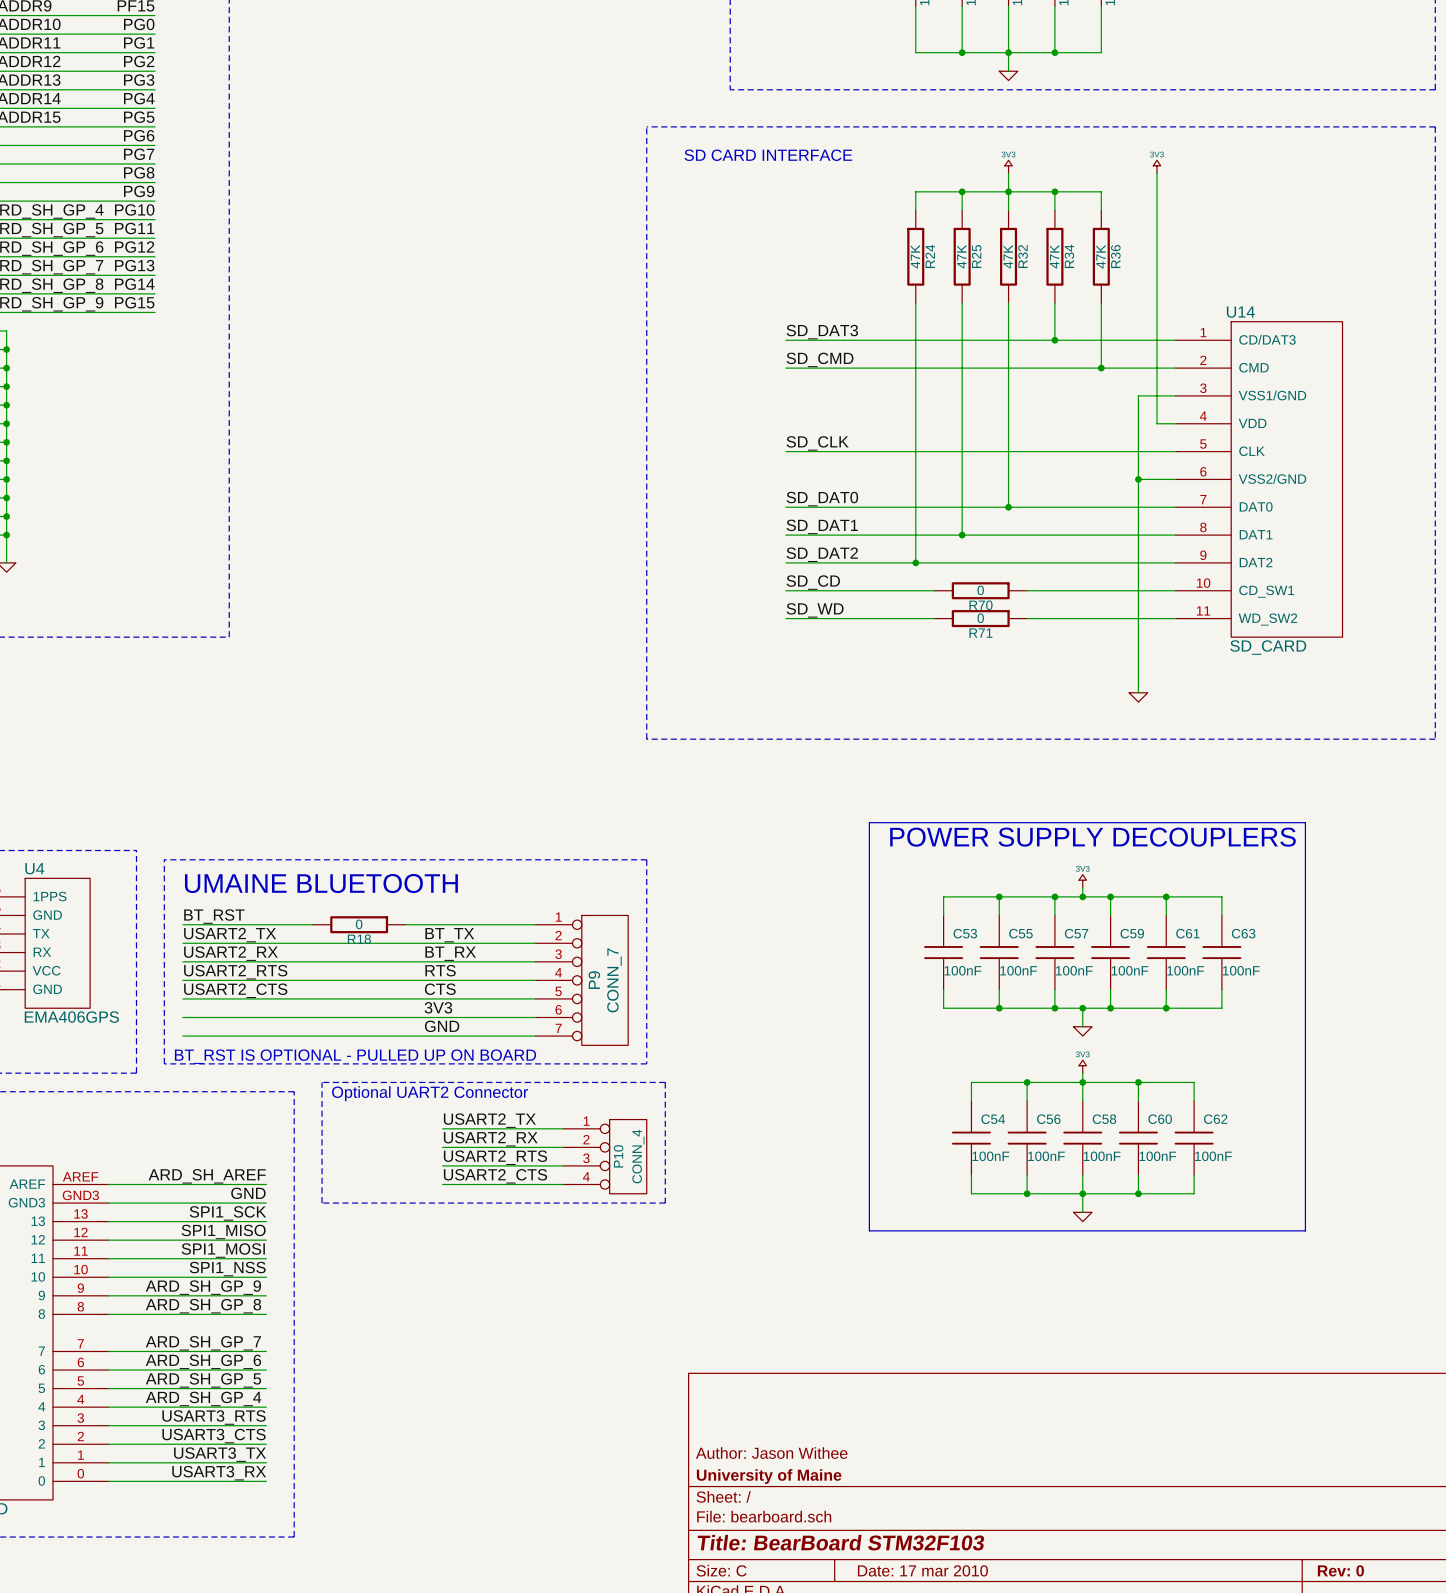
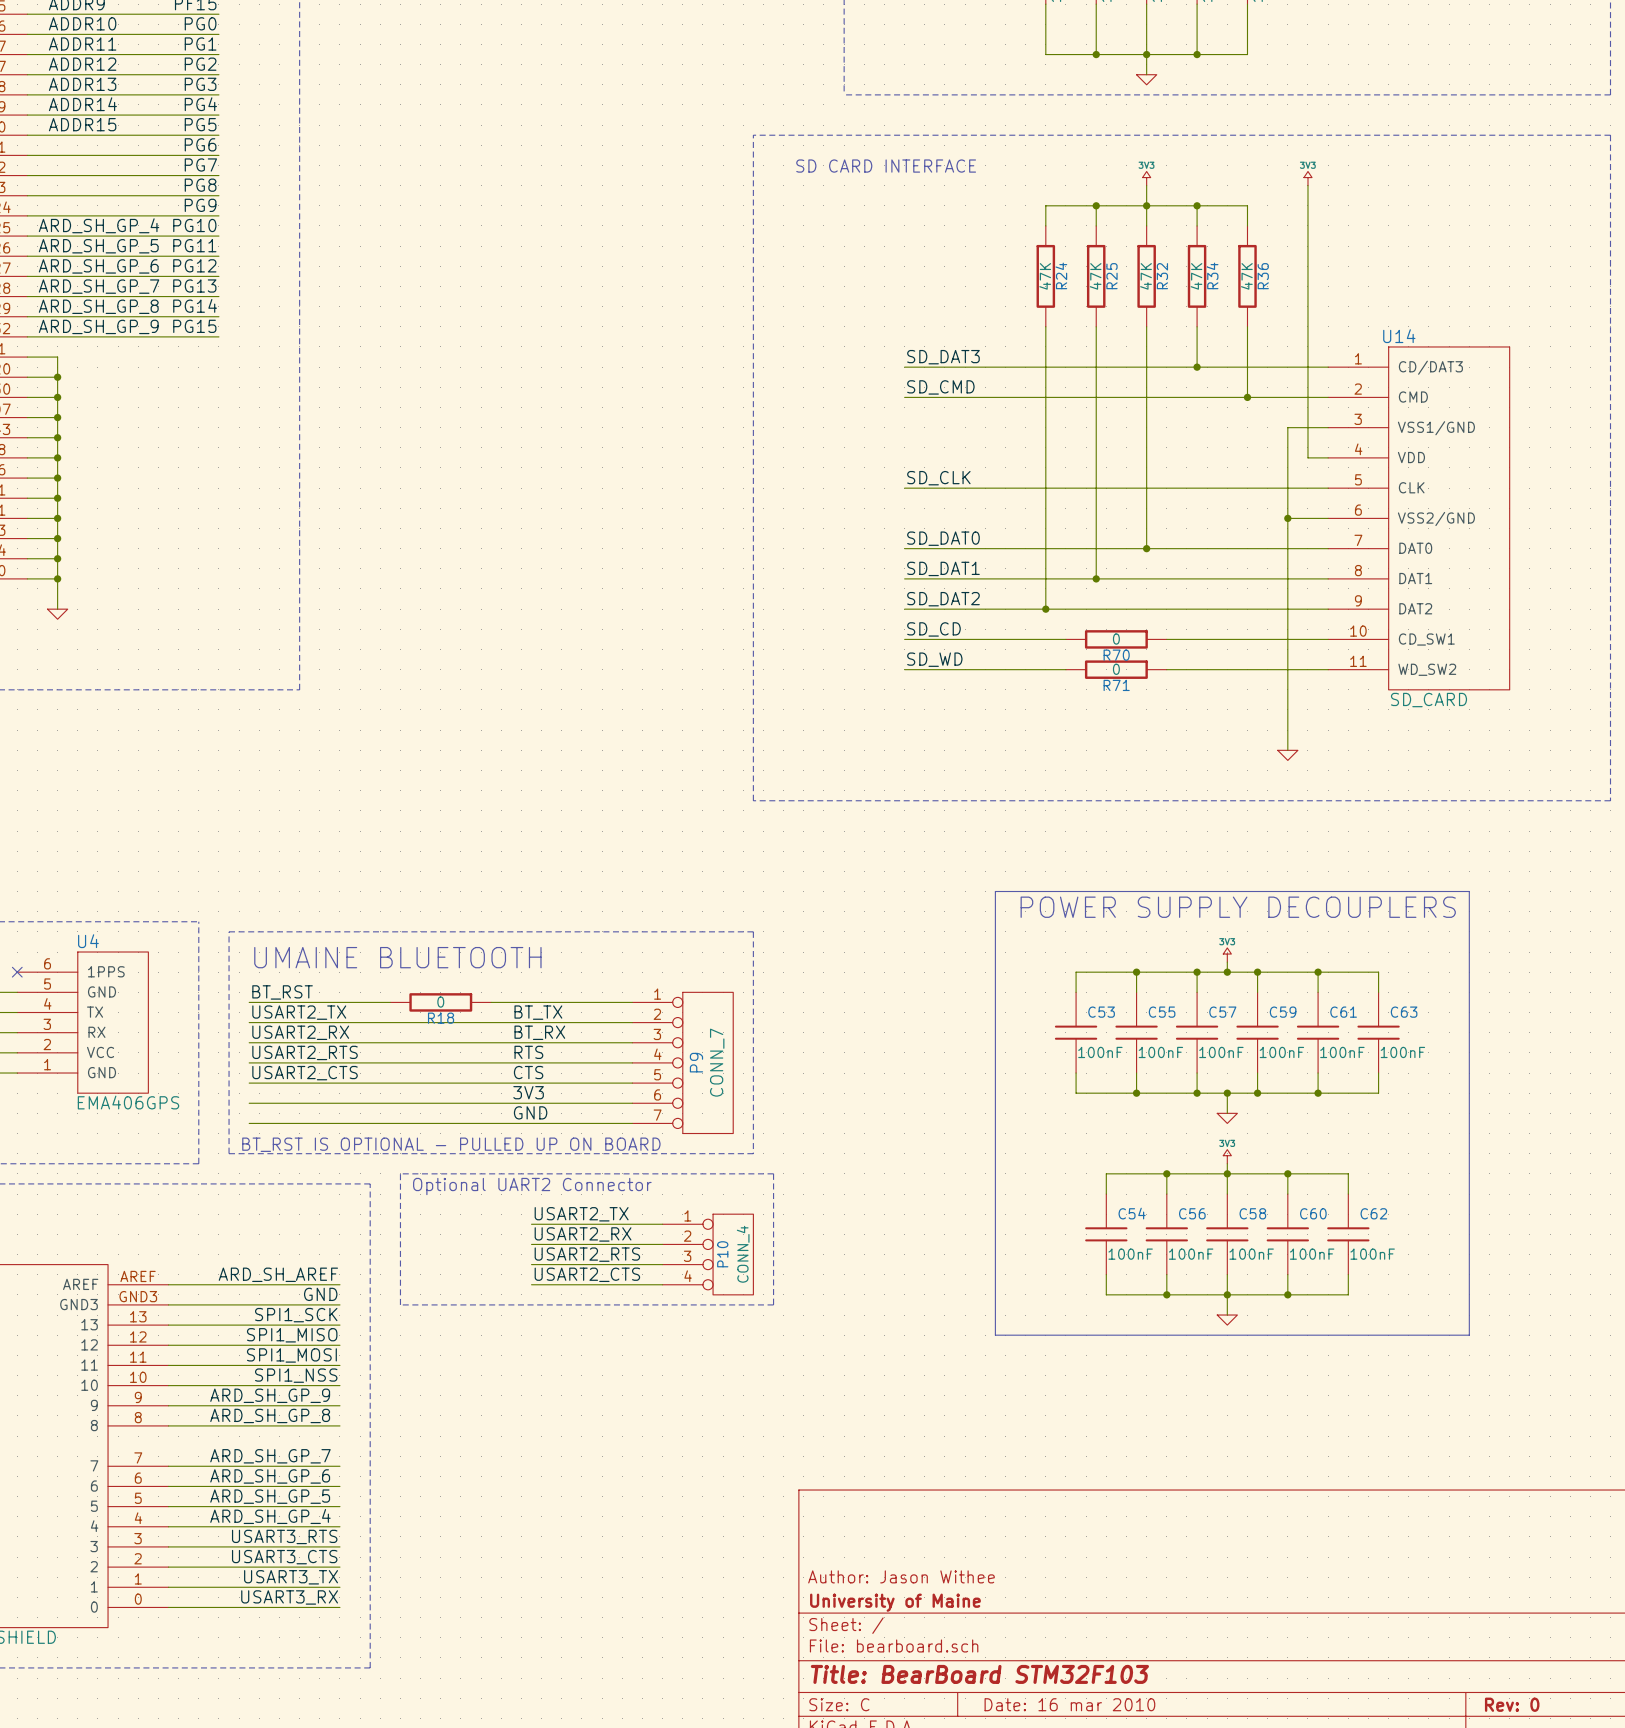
title block: Date: 17 mar 2010 (922, 1570) -> Date: 16 mar 2010 (1069, 1704)

